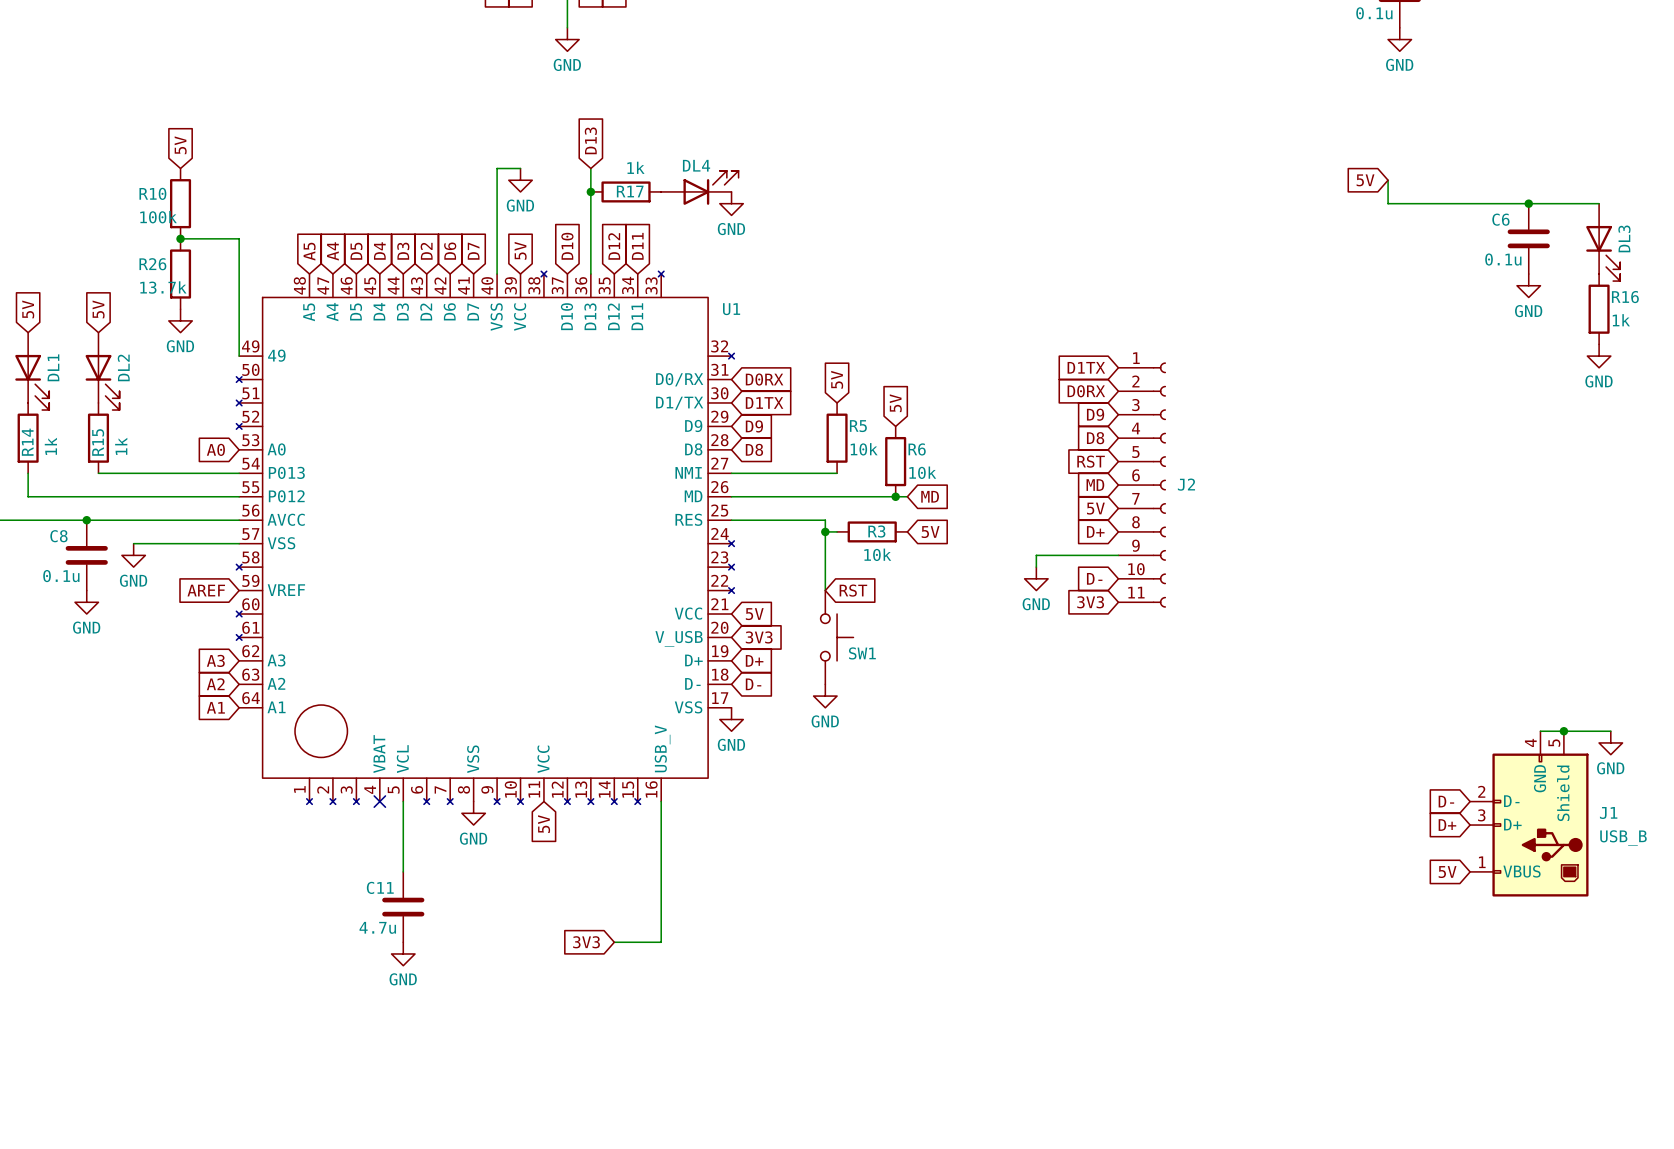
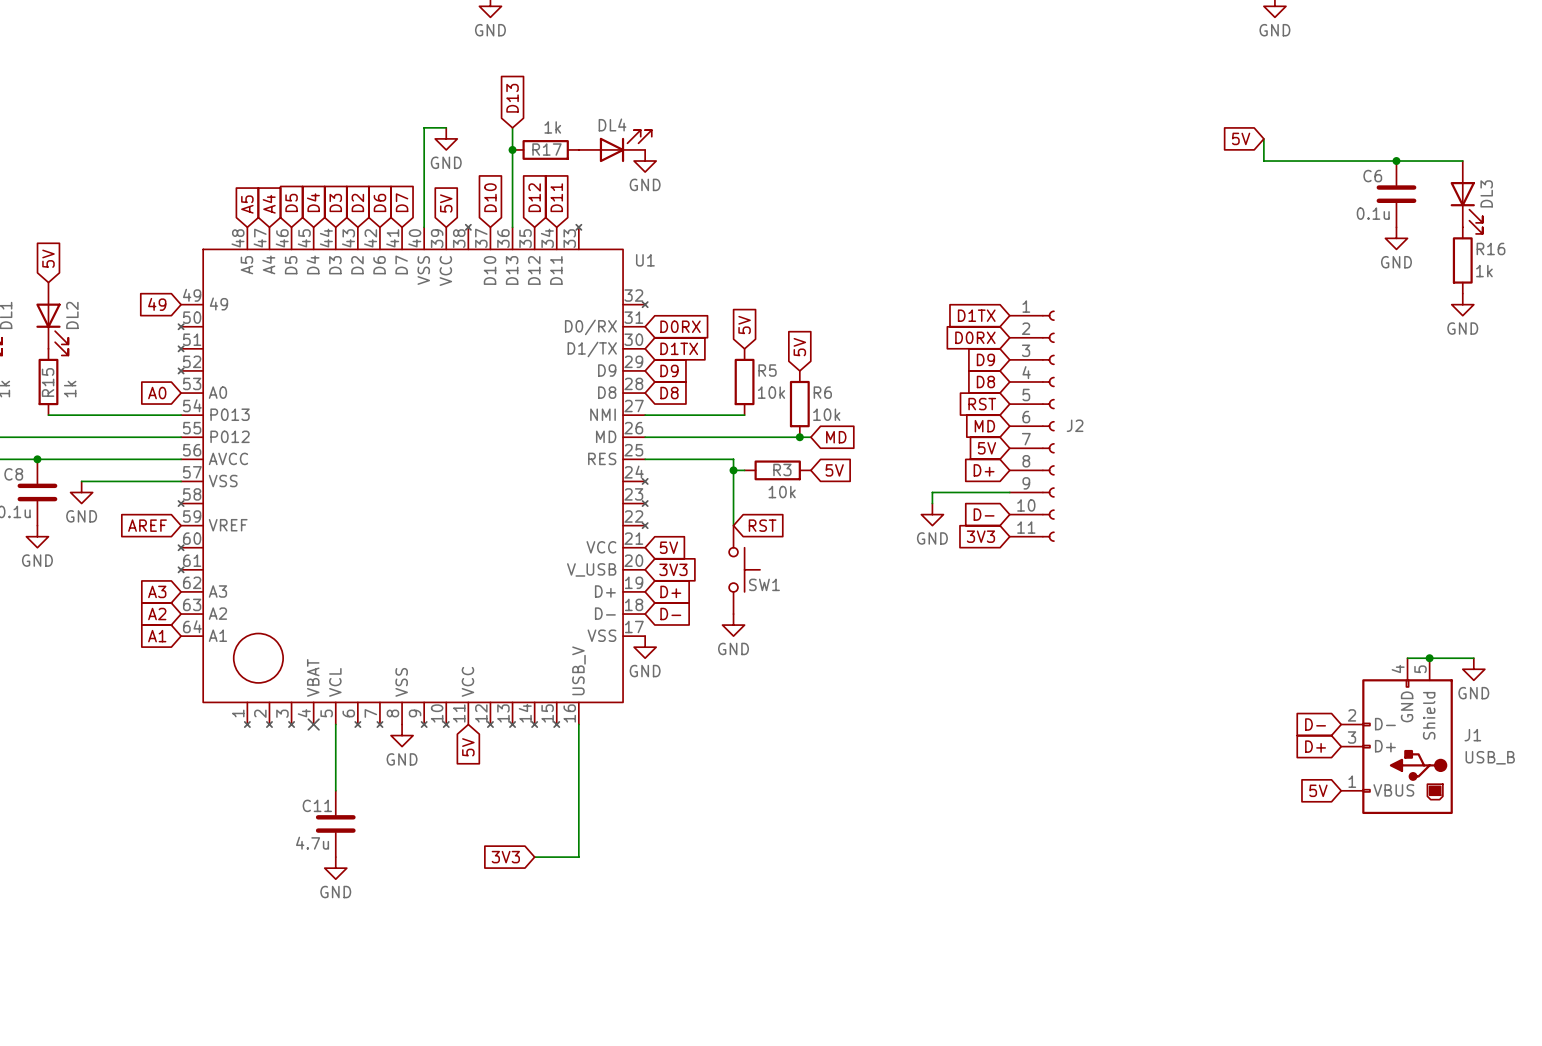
global label: 5V (180, 145) -> none
R10: 100k (180, 203) -> none
wire: (180, 238) (239, 238) (239, 356) -> none
junction: (180, 238) -> none
R26: 13.7k (180, 274) -> none
power symbol: GND (180, 320) -> none
global label: none -> 49 (157, 304)

